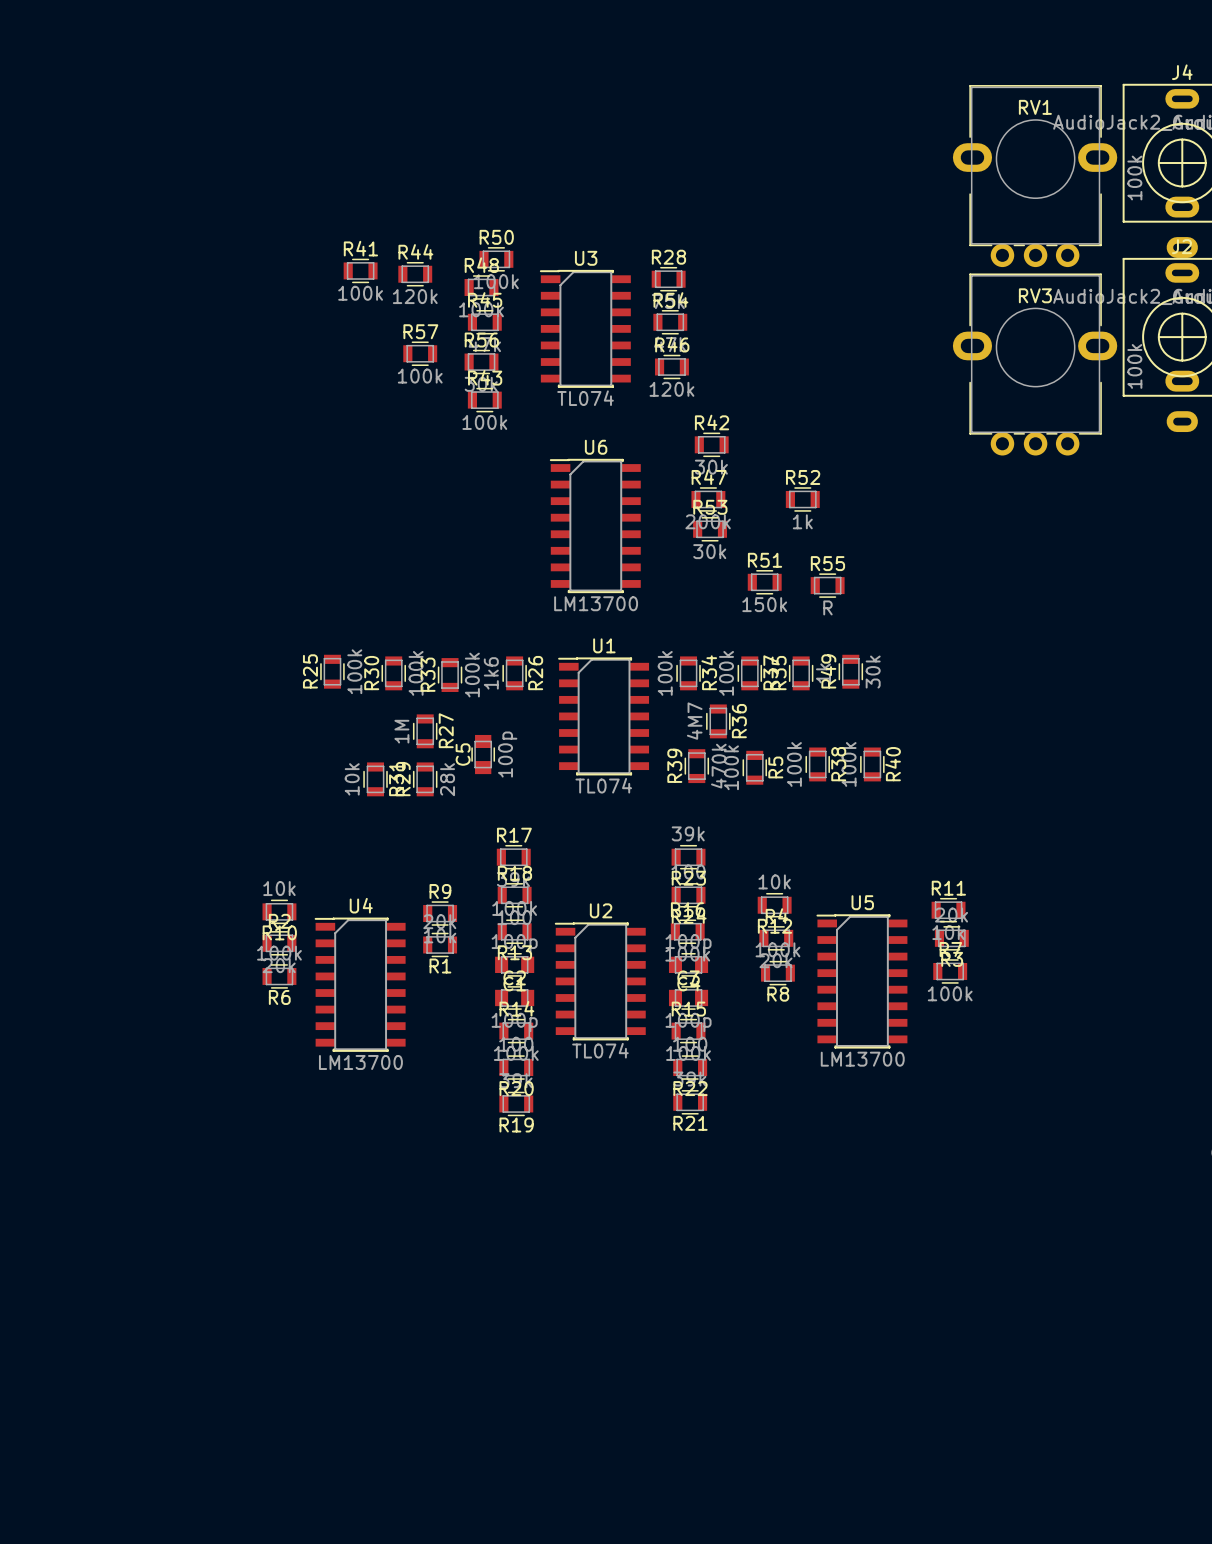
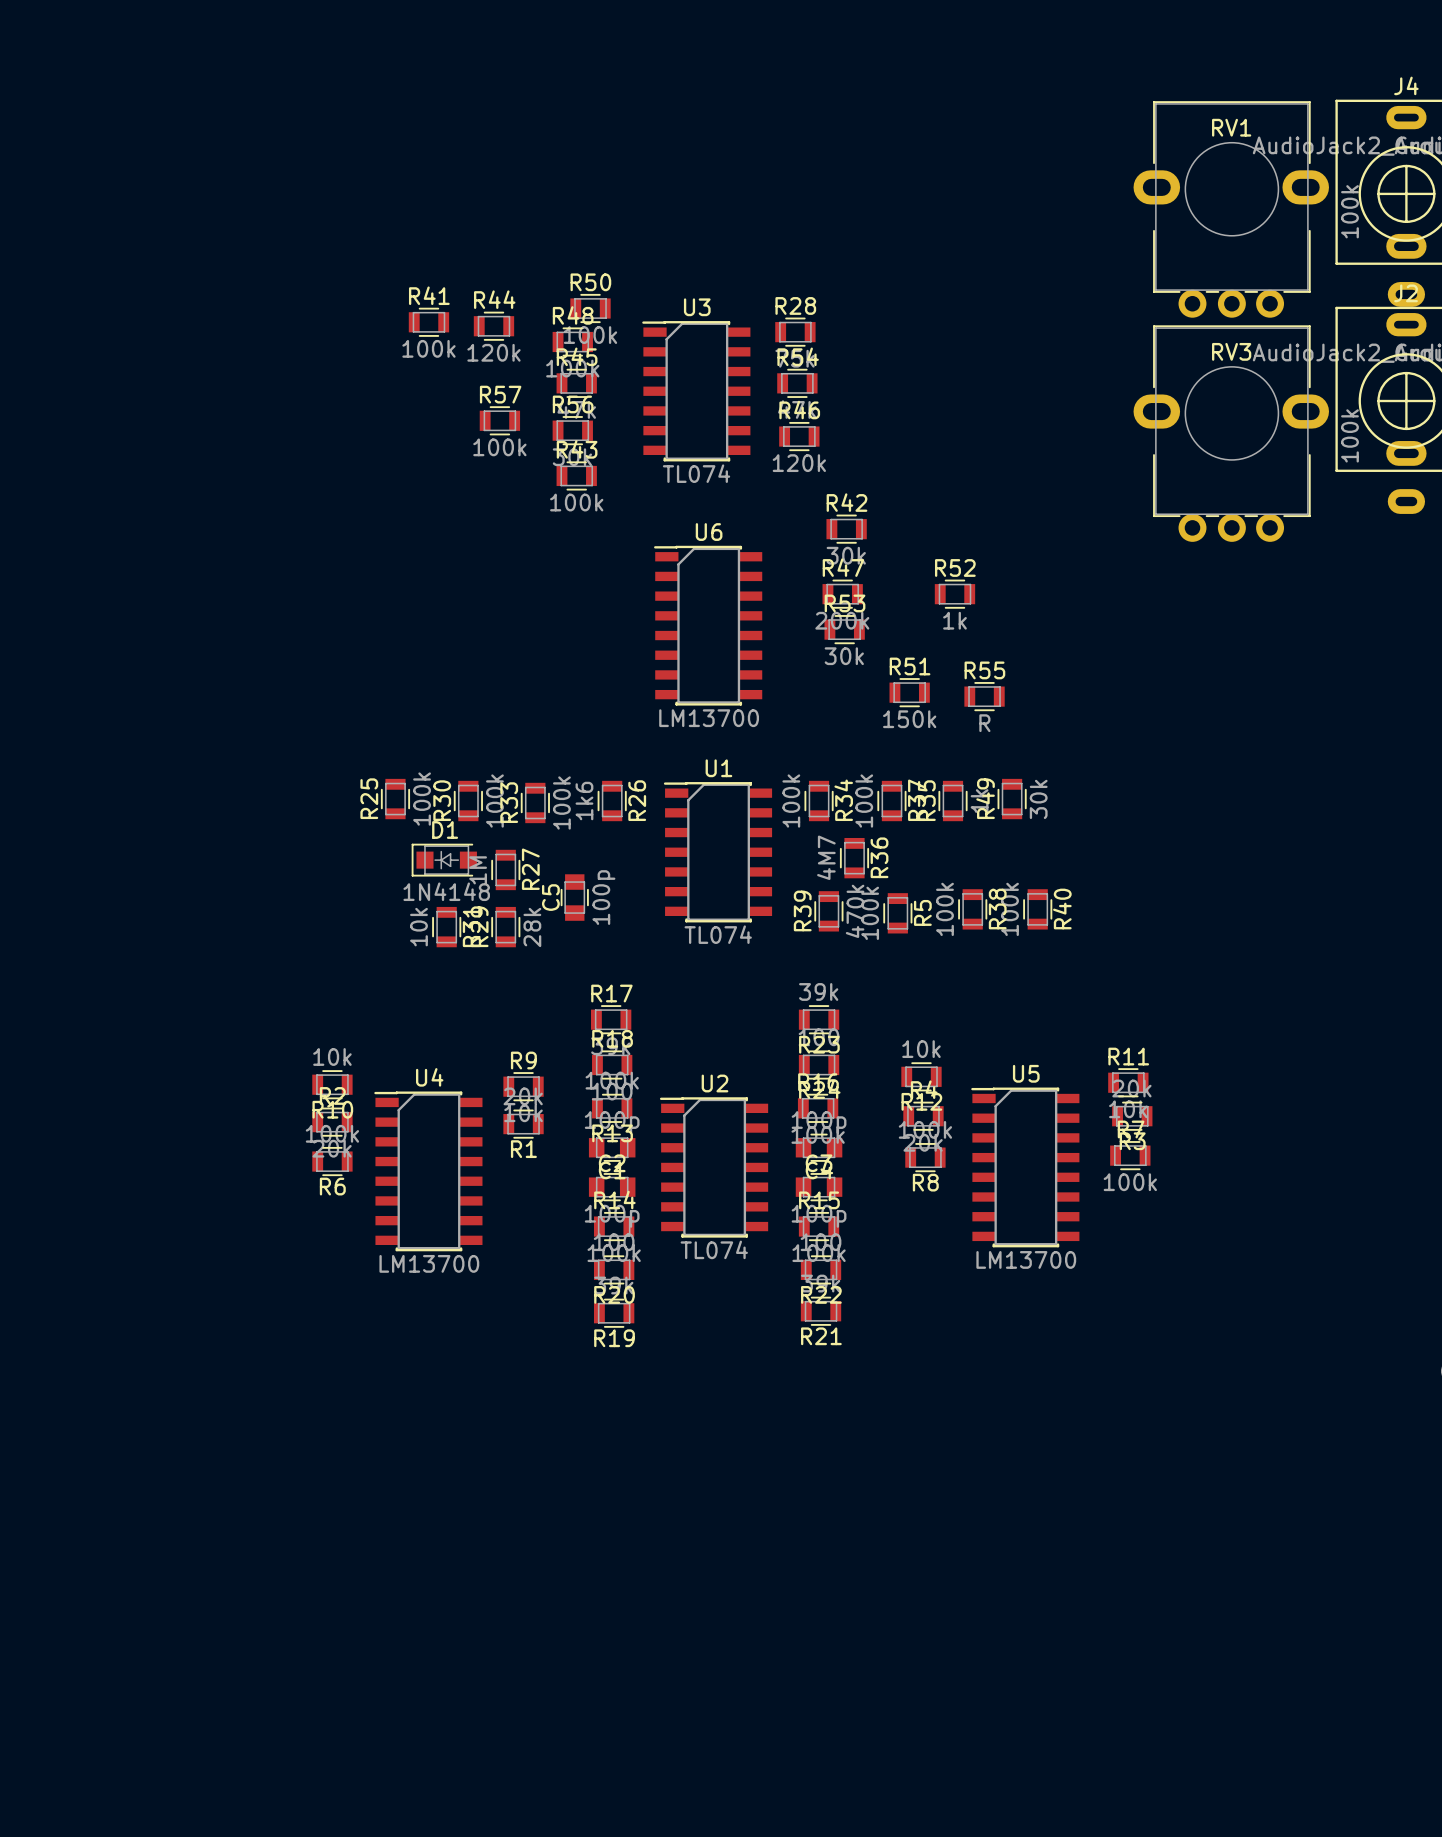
D1: none -> 1N4148 (444, 860)

